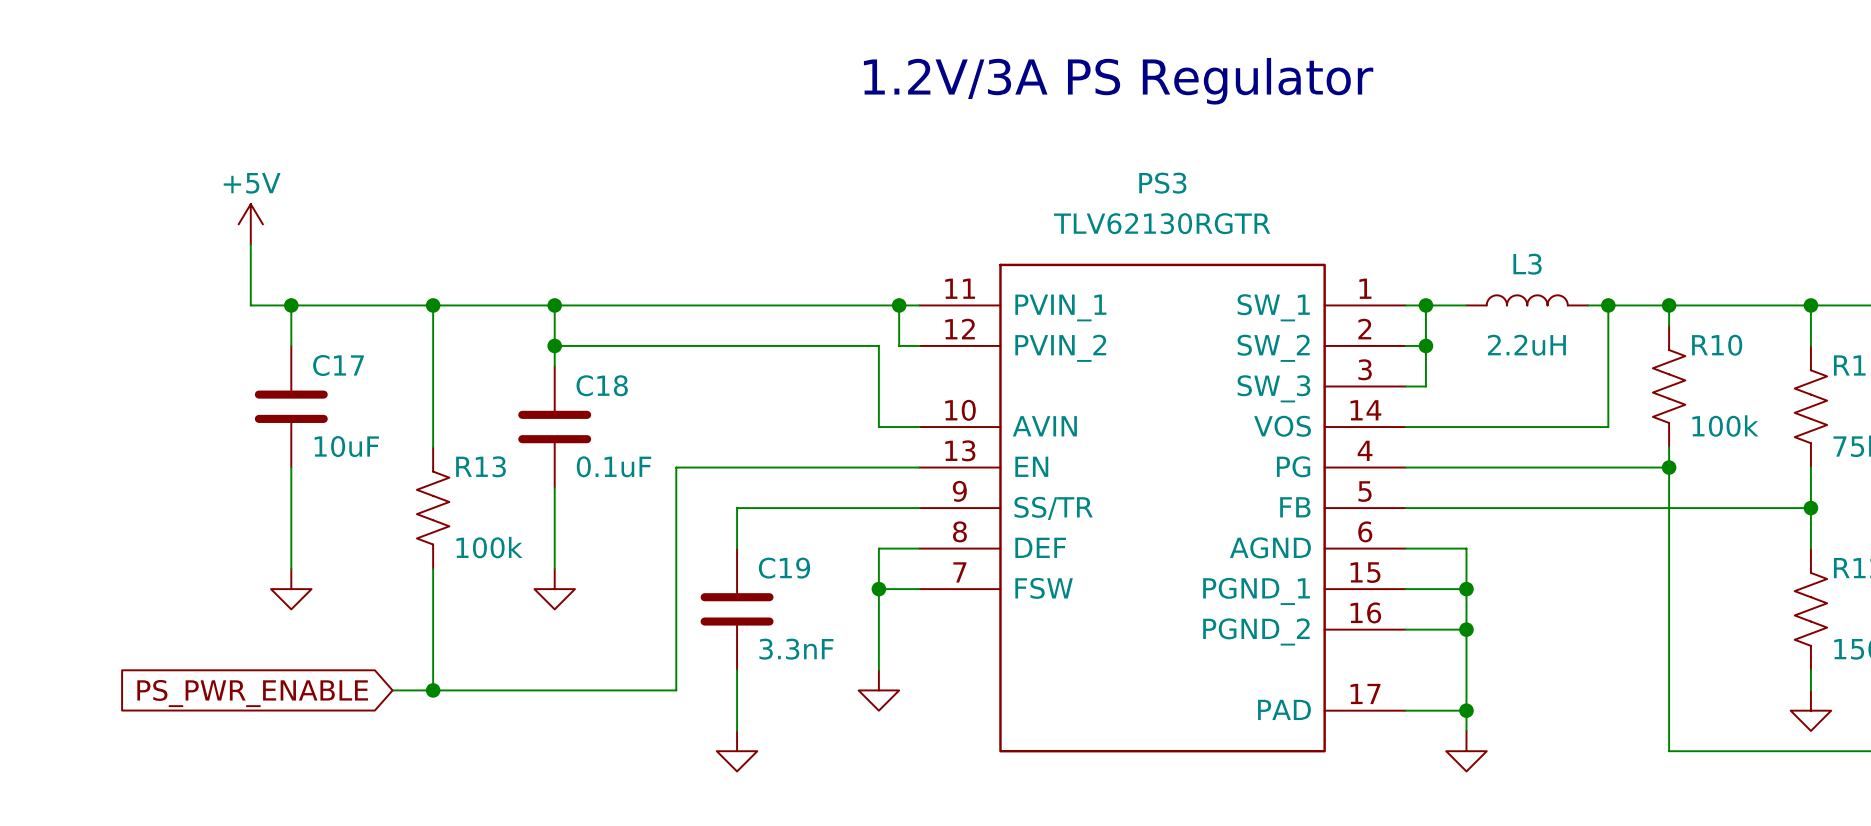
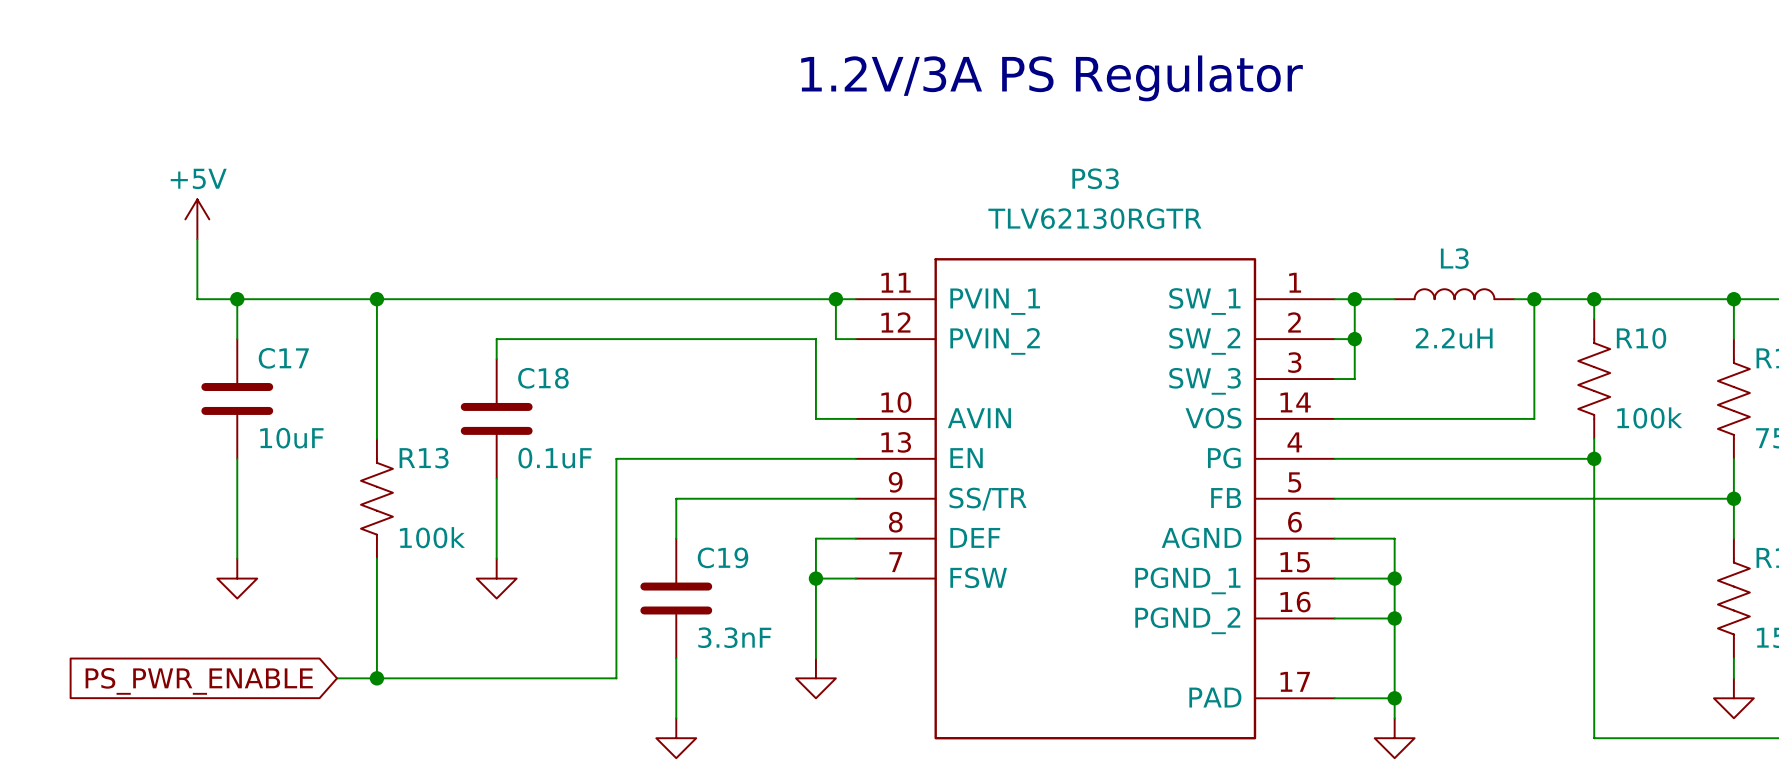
wire: (554, 305) (554, 345) -> none
junction: (554, 305) -> none
junction: (554, 345) -> none

